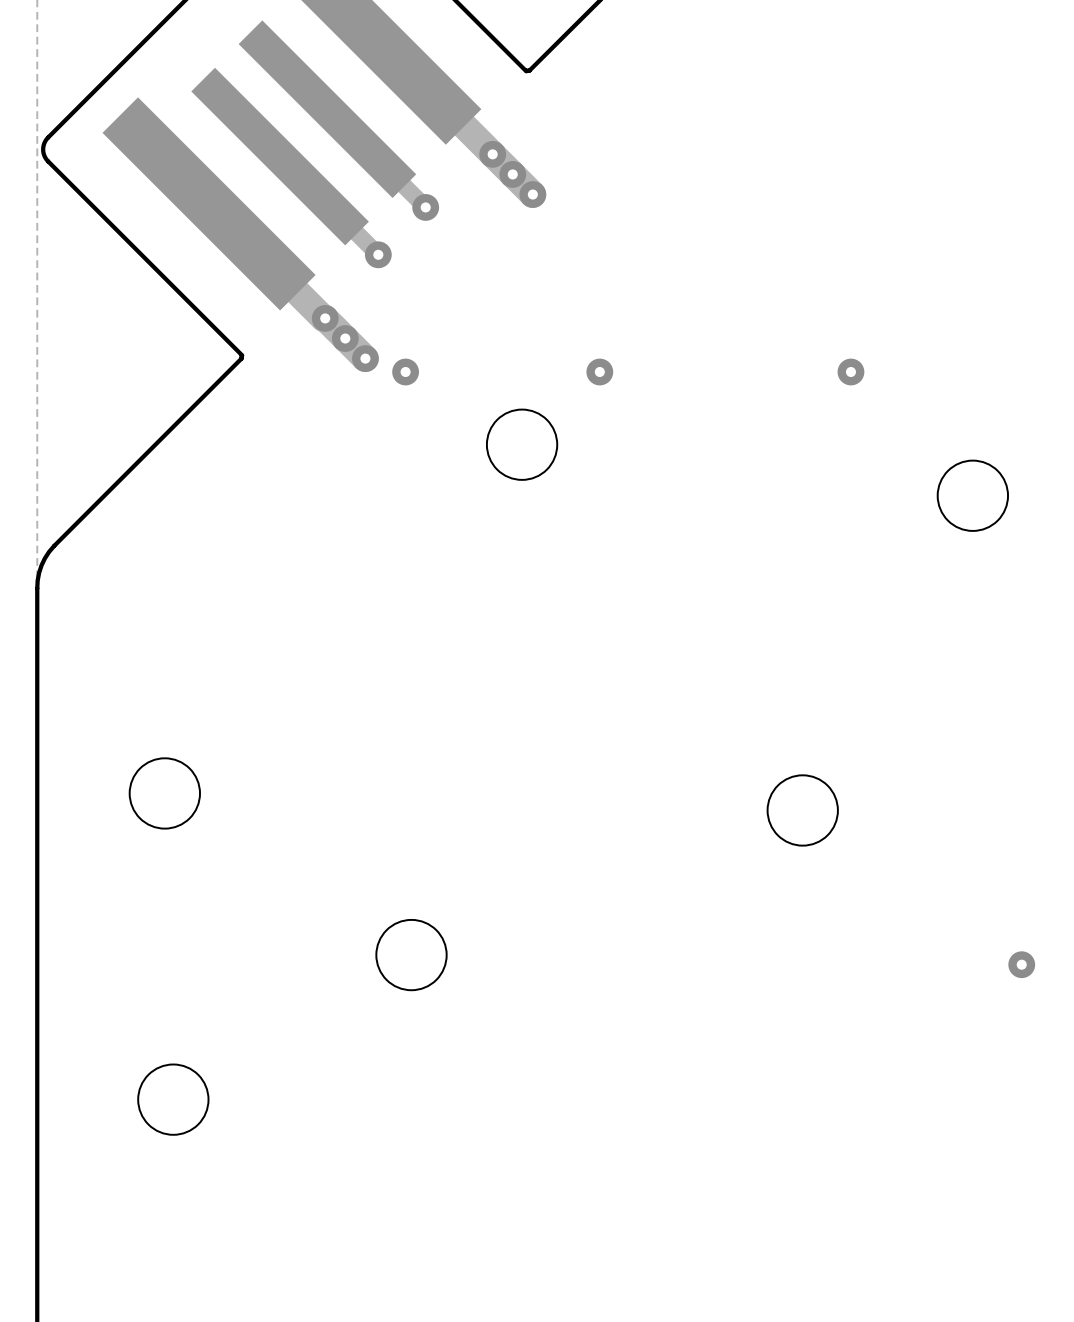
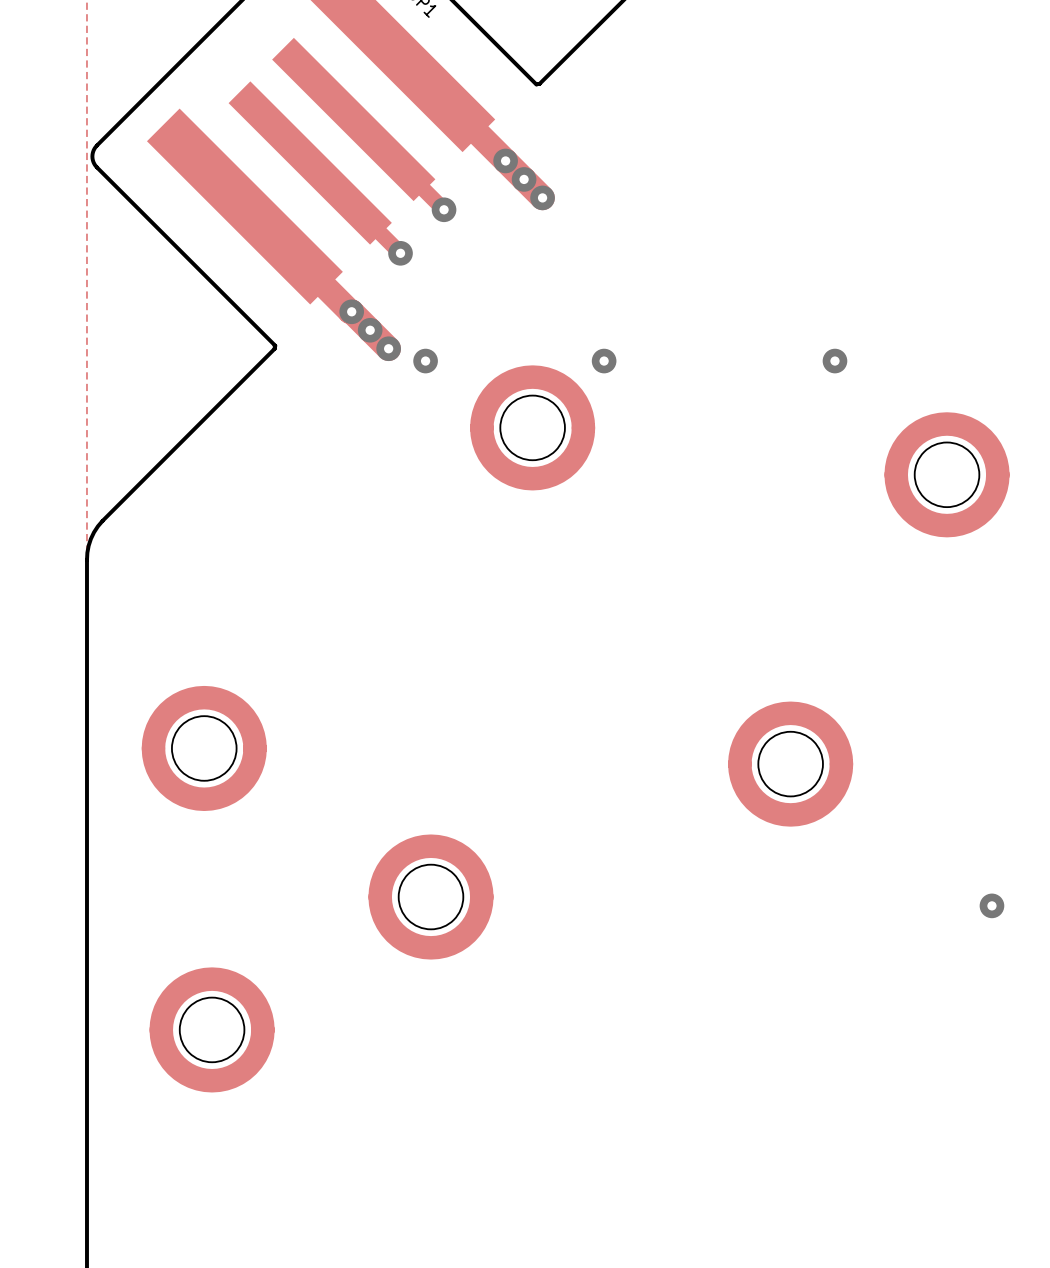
track: none -> (481, 427) (485, 408) (496, 391) (513, 380) (532, 377) (552, 380) (568, 391) (579, 408) (583, 427) (579, 447) (568, 463) (552, 474) (532, 478) (513, 474) (496, 463) (485, 447) (481, 427)
track: none -> (896, 474) (900, 455) (911, 438) (927, 427) (947, 423) (966, 427) (982, 438) (993, 455) (997, 474) (993, 494) (982, 510) (966, 521) (947, 525) (927, 521) (911, 510) (900, 494) (896, 474)
track: none -> (153, 748) (157, 729) (168, 712) (184, 701) (204, 697) (223, 701) (240, 712) (251, 729) (255, 748) (251, 767) (240, 784) (223, 795) (204, 799) (184, 795) (168, 784) (157, 767) (153, 748)
track: none -> (739, 764) (743, 744) (754, 728) (771, 717) (790, 713) (810, 717) (826, 728) (837, 744) (841, 764) (837, 783) (826, 800) (810, 811) (790, 814) (771, 811) (754, 800) (743, 783) (739, 764)
track: none -> (380, 897) (384, 877) (395, 861) (411, 850) (431, 846) (450, 850) (466, 861) (477, 877) (481, 897) (477, 916) (466, 932) (450, 943) (431, 947) (411, 943) (395, 932) (384, 916) (380, 897)
track: none -> (161, 1029) (165, 1010) (176, 993) (192, 982) (212, 979) (231, 982) (248, 993) (259, 1010) (262, 1029) (259, 1049) (248, 1065) (231, 1076) (212, 1080) (192, 1076) (176, 1065) (165, 1049) (161, 1029)

